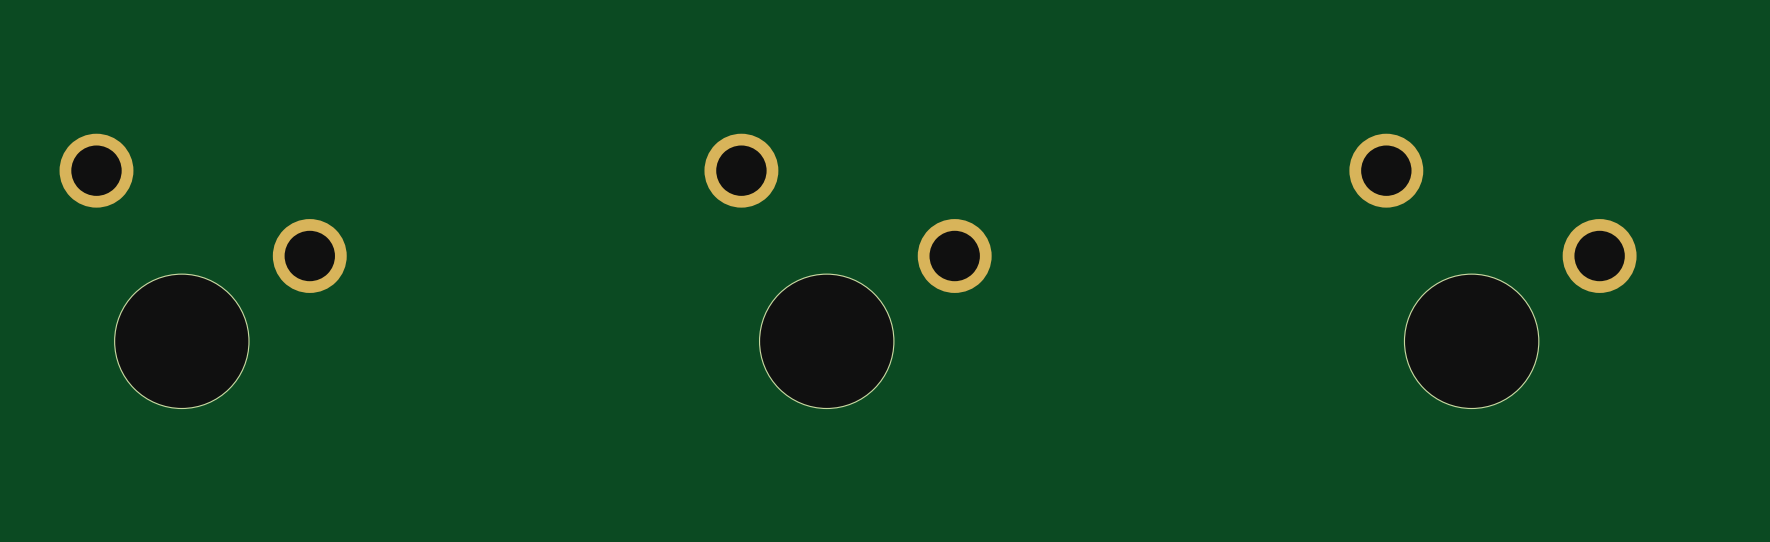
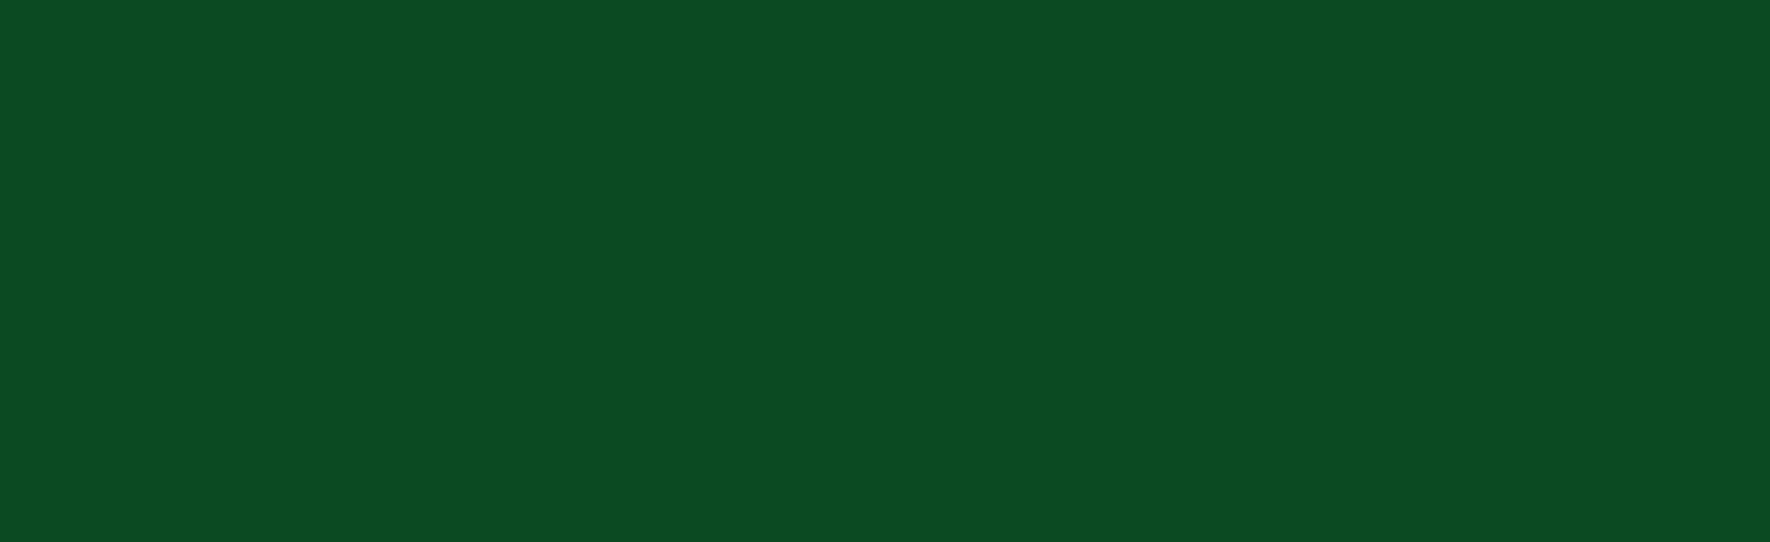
part: (203, 271) -> none
part: (848, 271) -> none
part: (1492, 271) -> none

